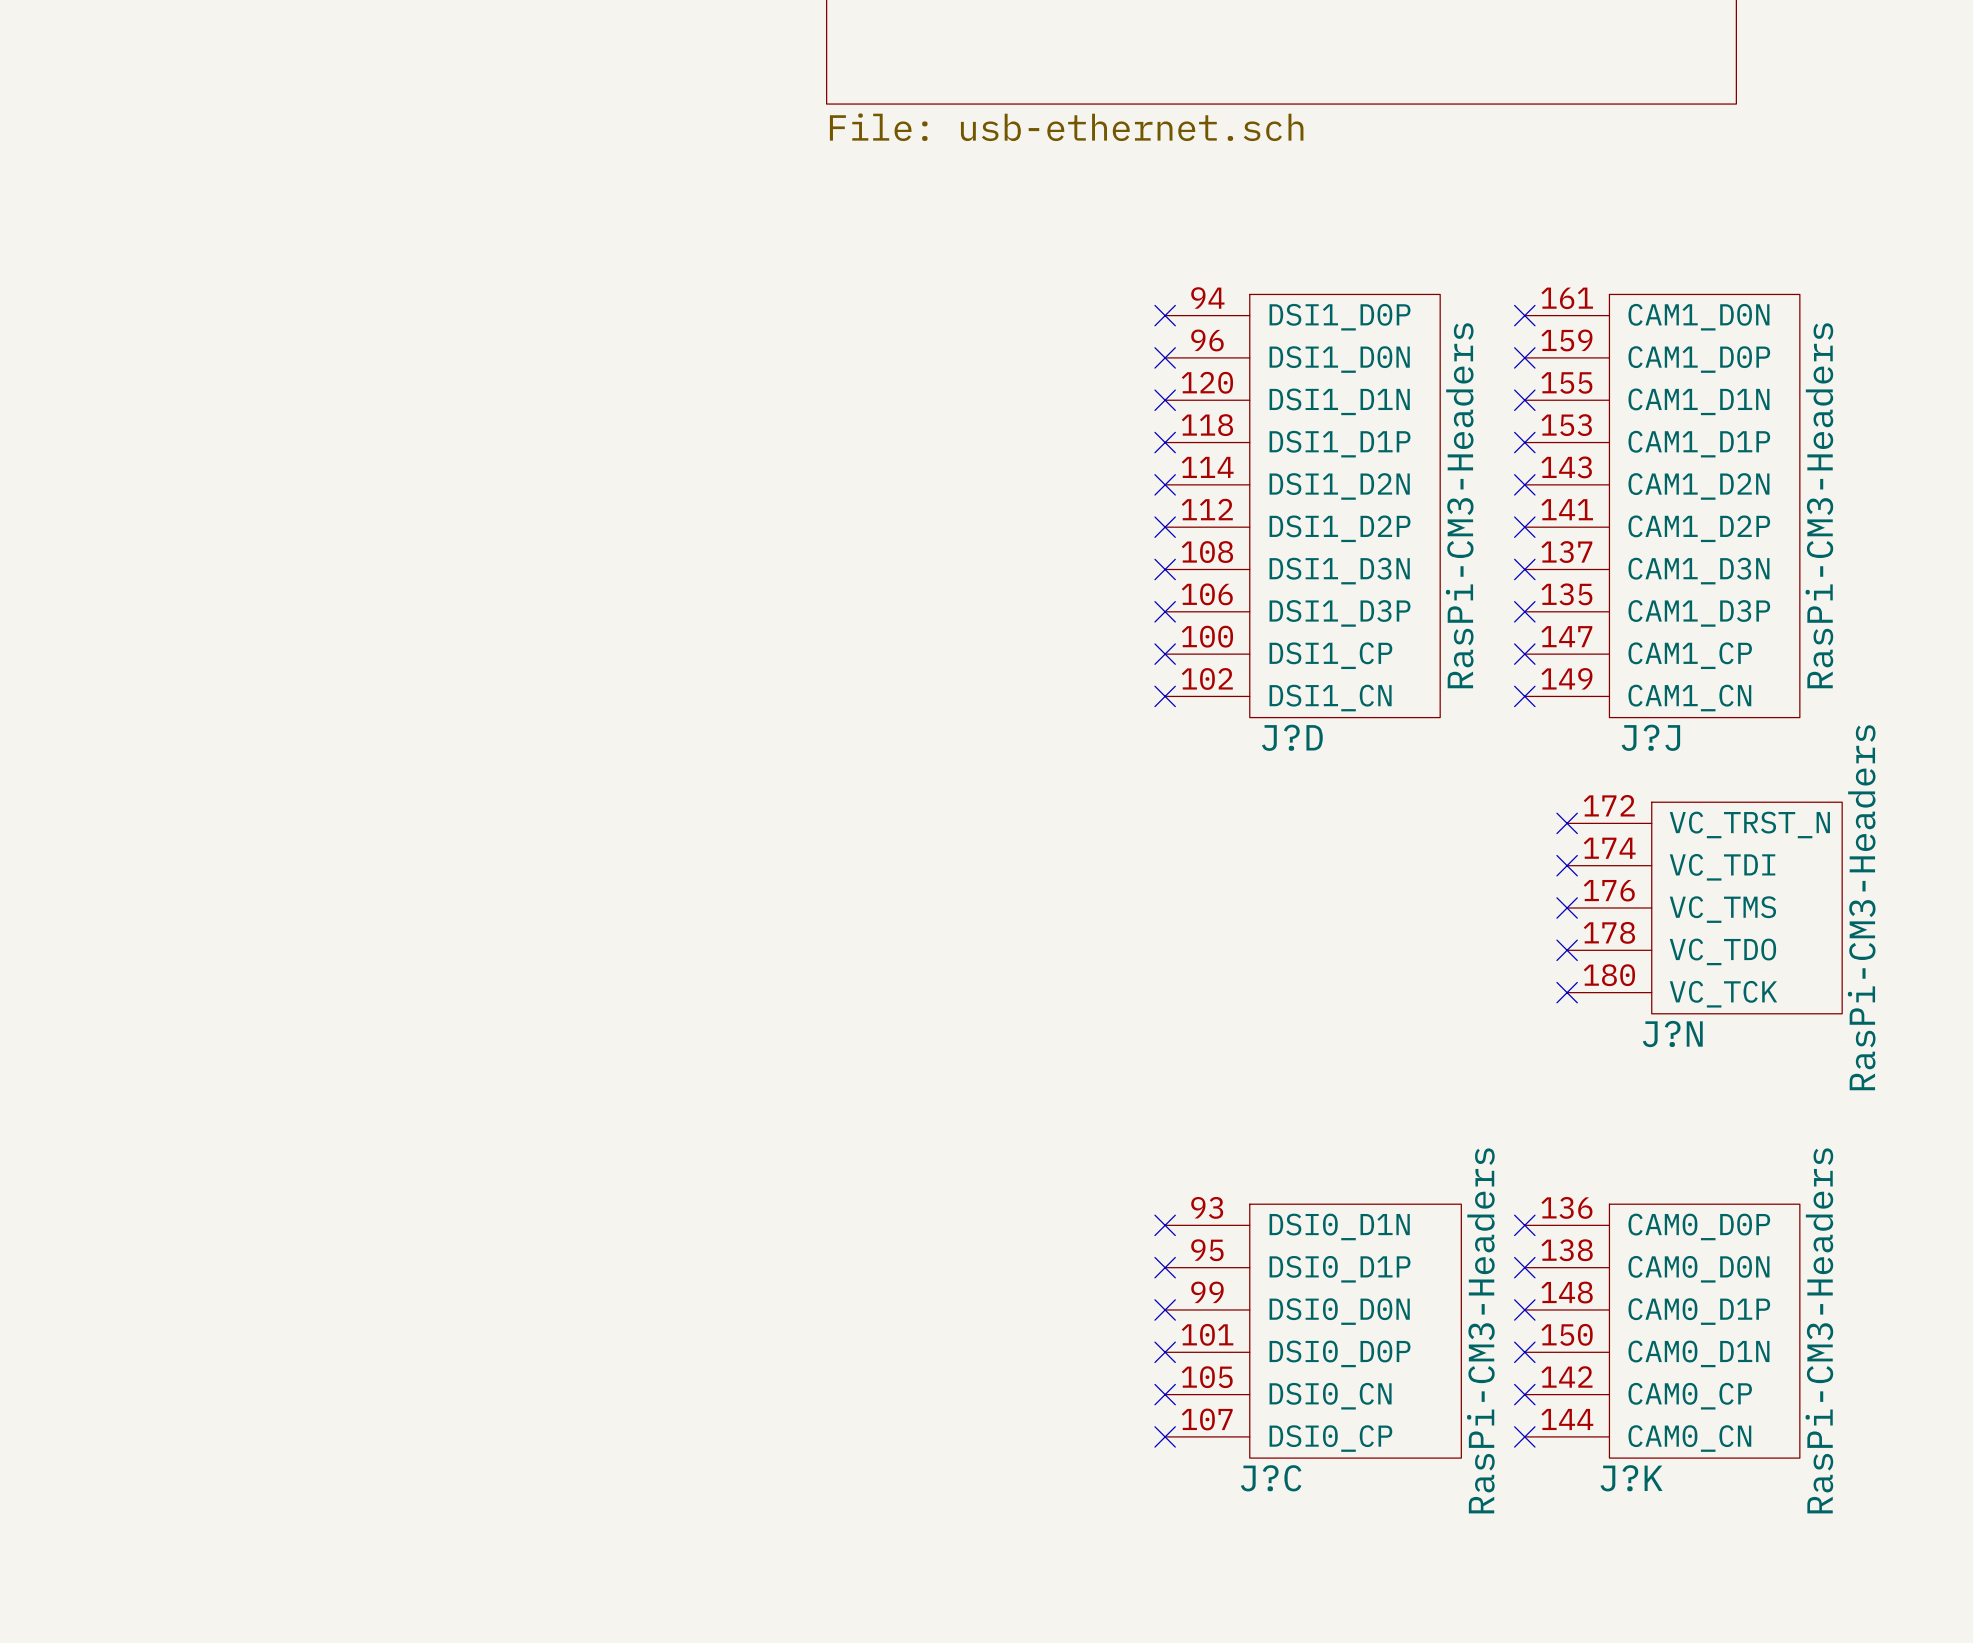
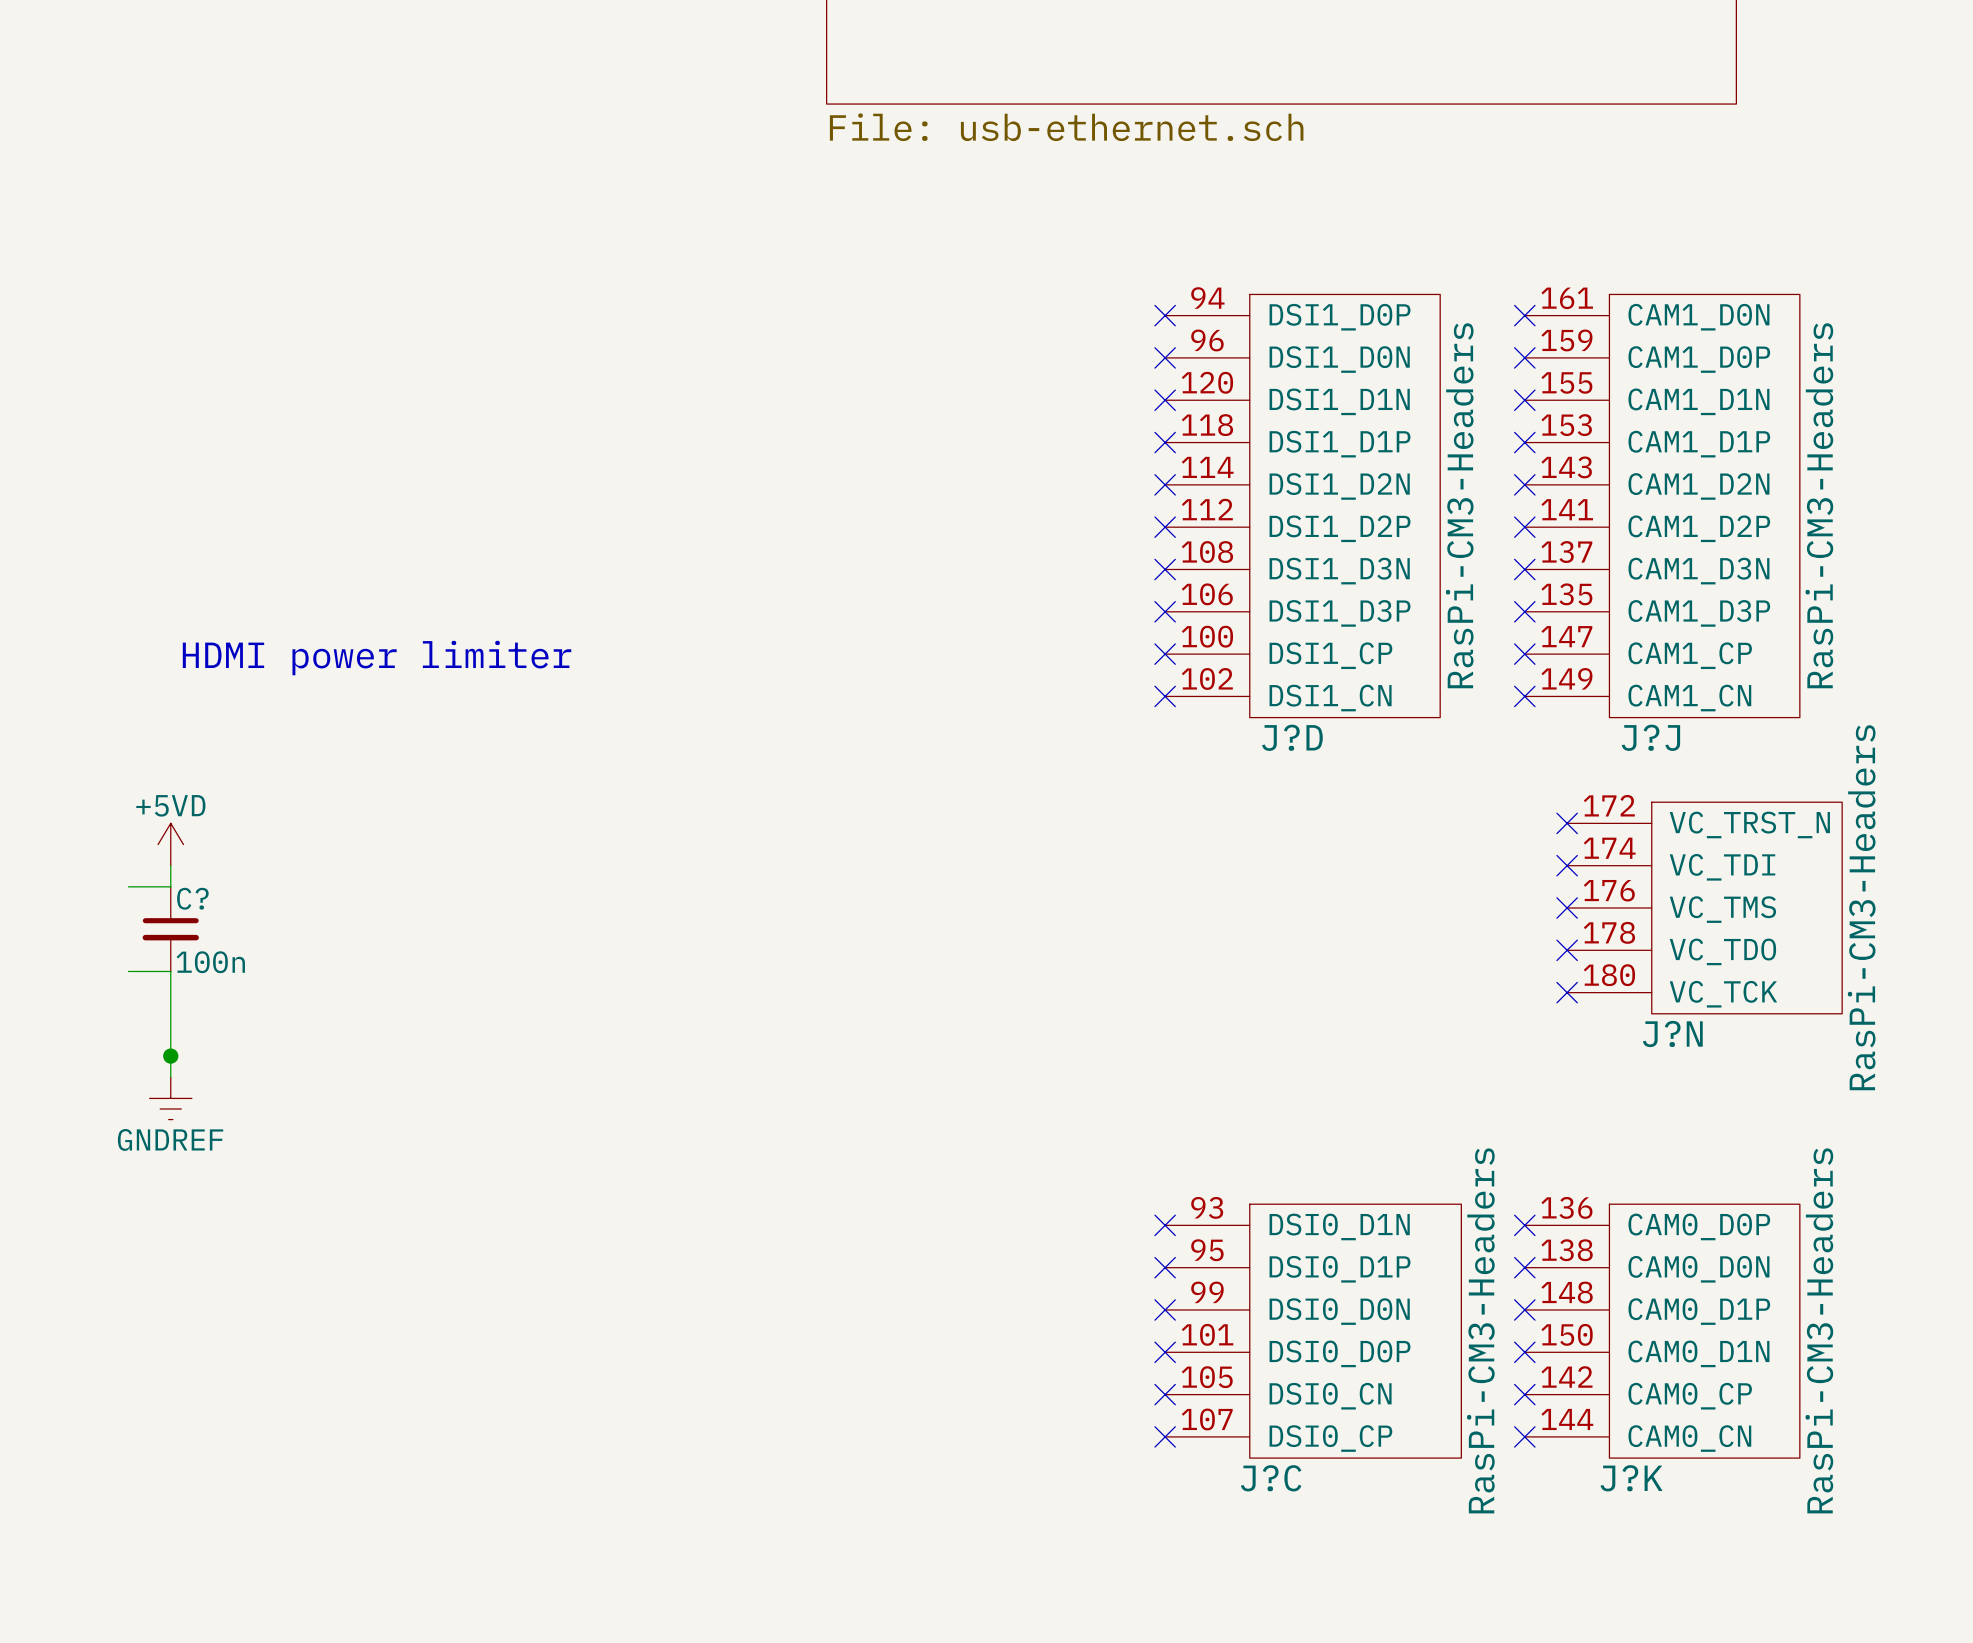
text: none -> HDMI power limiter (377, 658)
power symbol: none -> +5VD (170, 844)
wire: none -> (170, 865) (170, 886) (128, 886)
C?: none -> 100n (170, 929)
wire: none -> (128, 971) (170, 971) (170, 1077)
junction: none -> (170, 1056)
power symbol: none -> GNDREF (170, 1098)

